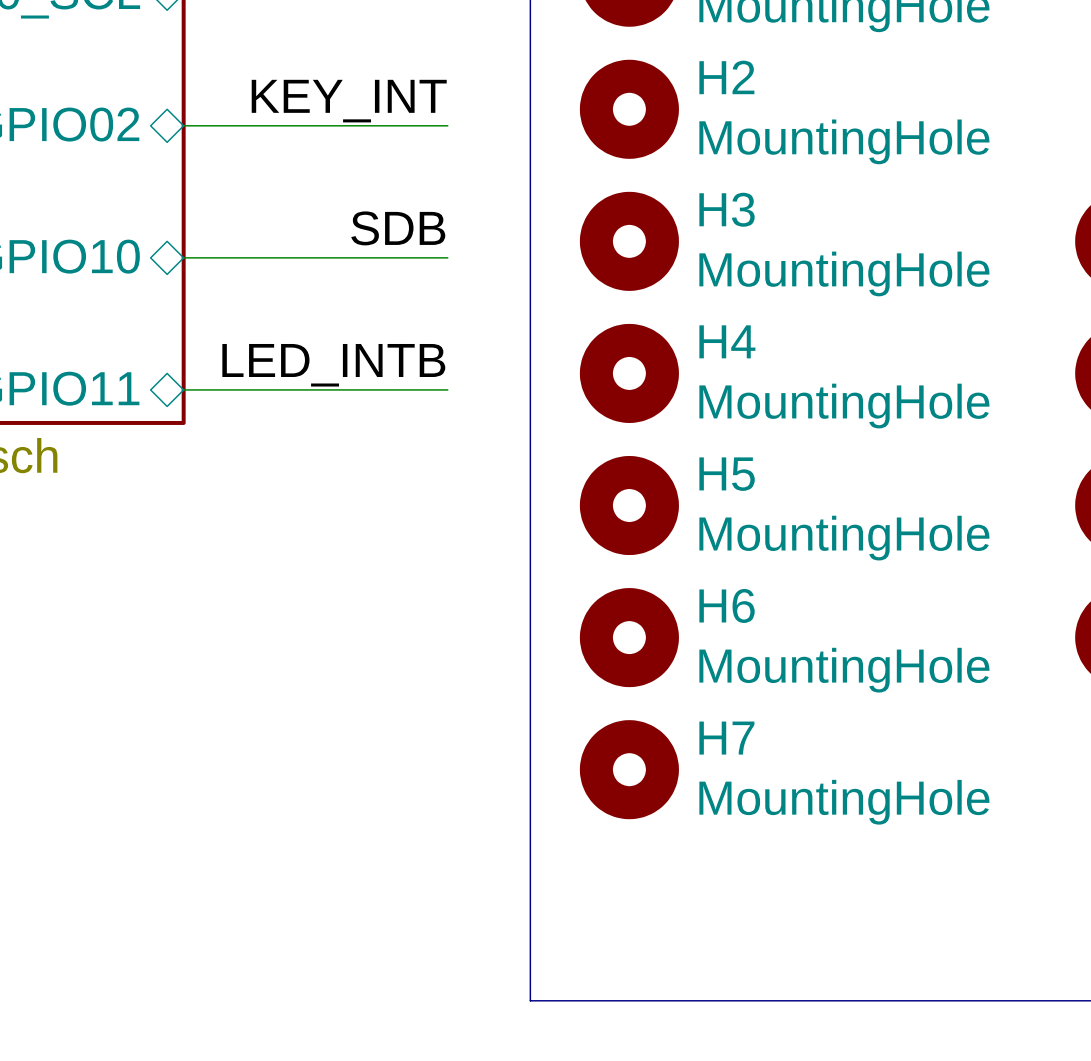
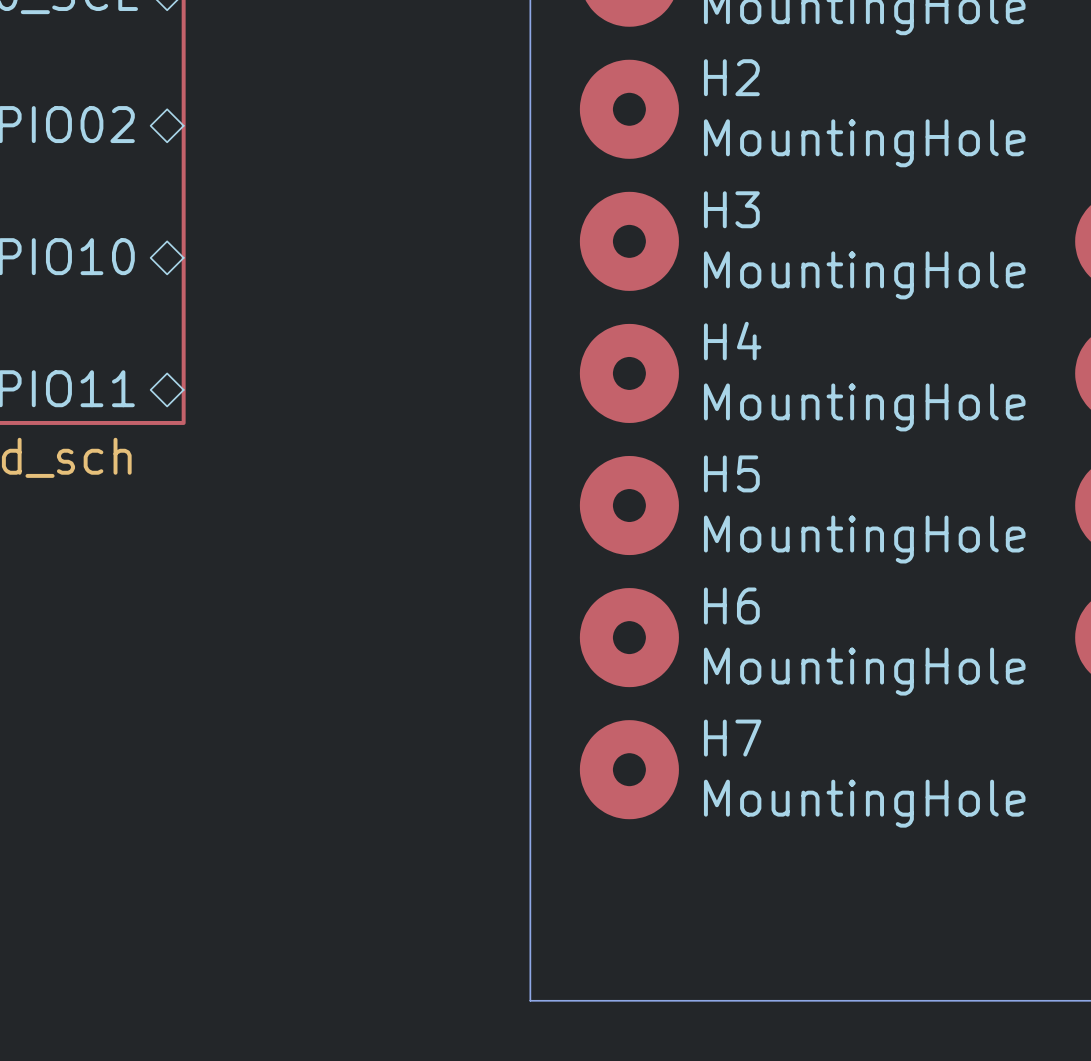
label: KEY_INT (349, 101) -> none
wire: (183, 125) (447, 125) -> none
label: SDB (398, 228) -> none
wire: (183, 257) (447, 257) -> none
label: LED_INTB (333, 365) -> none
wire: (183, 389) (447, 389) -> none

